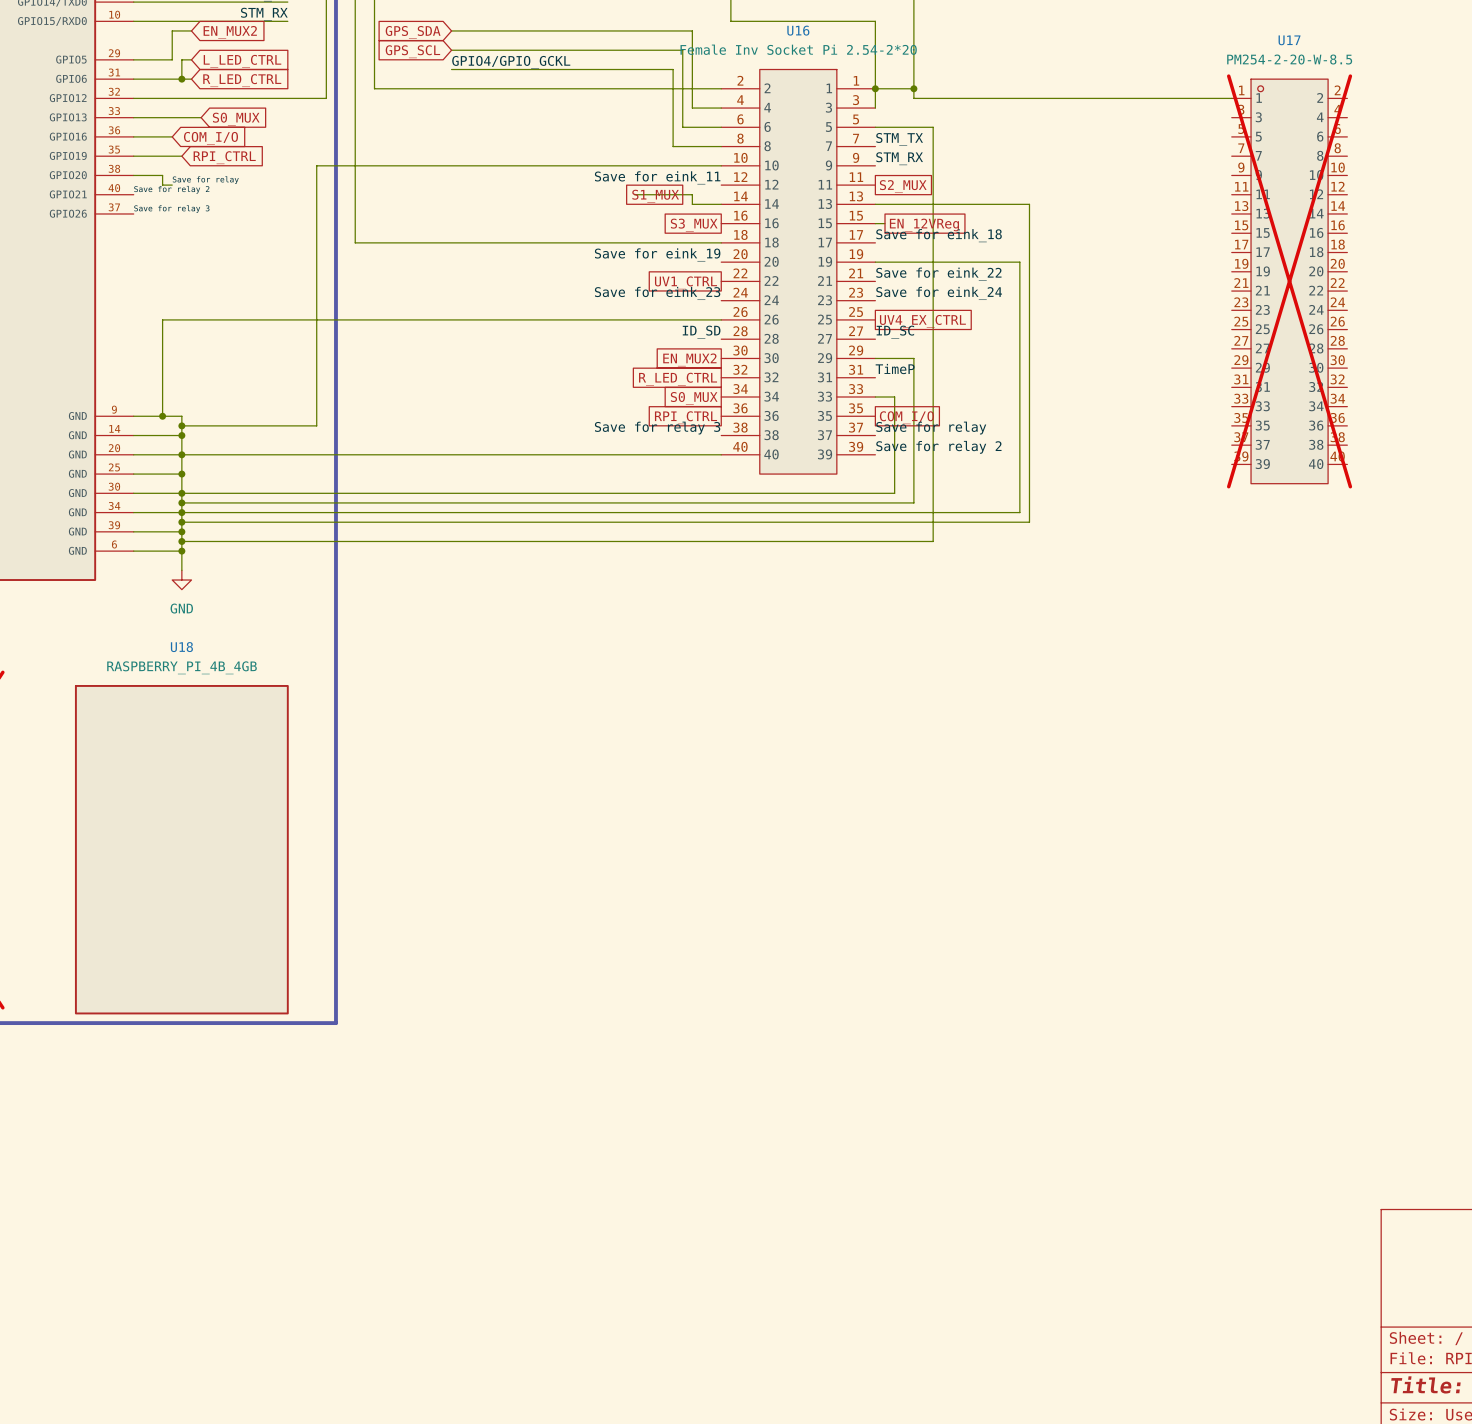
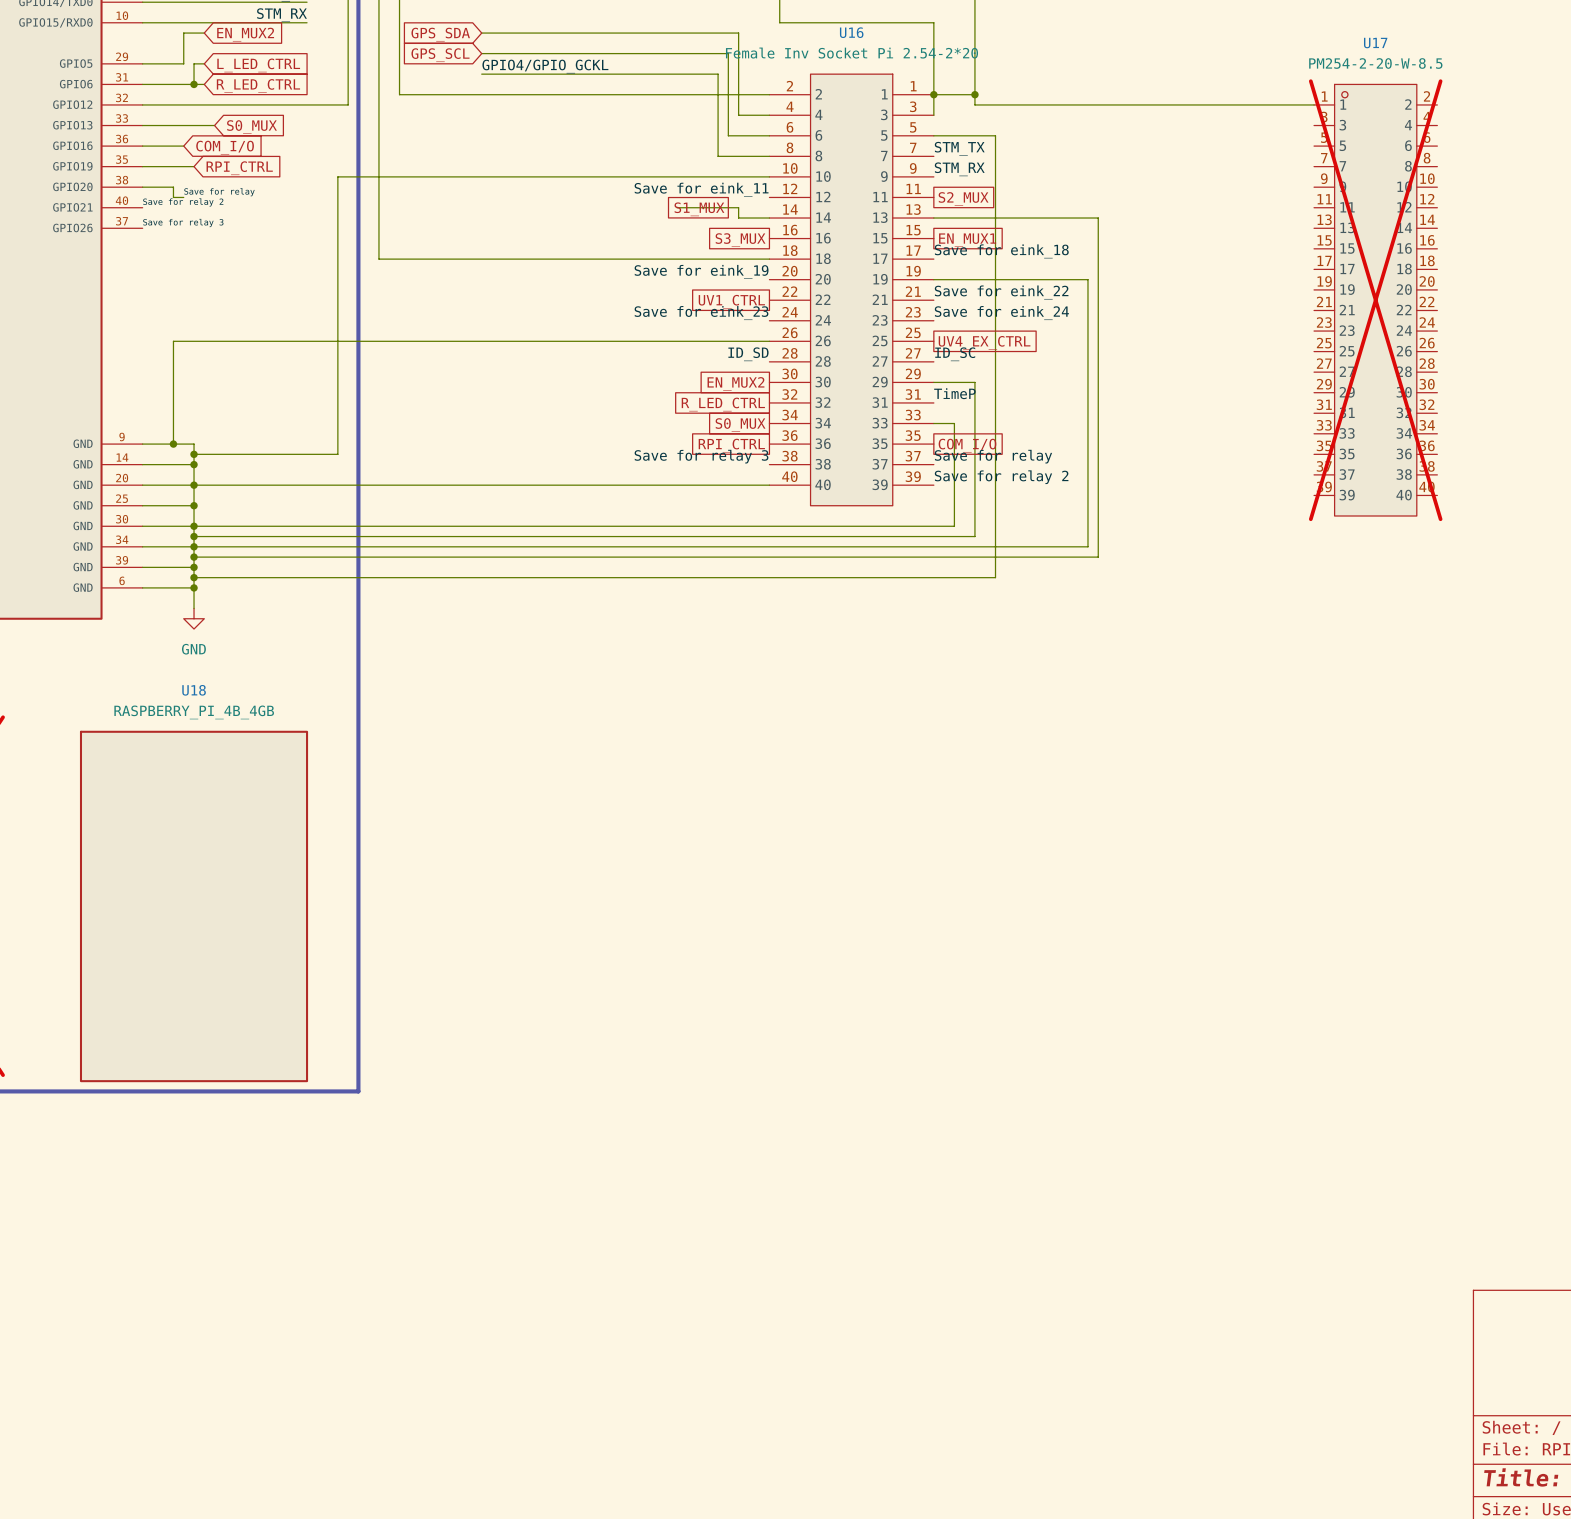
global label: none -> EN_MUX1 (967, 240)
global label: EN_12VReg (924, 225) -> none

